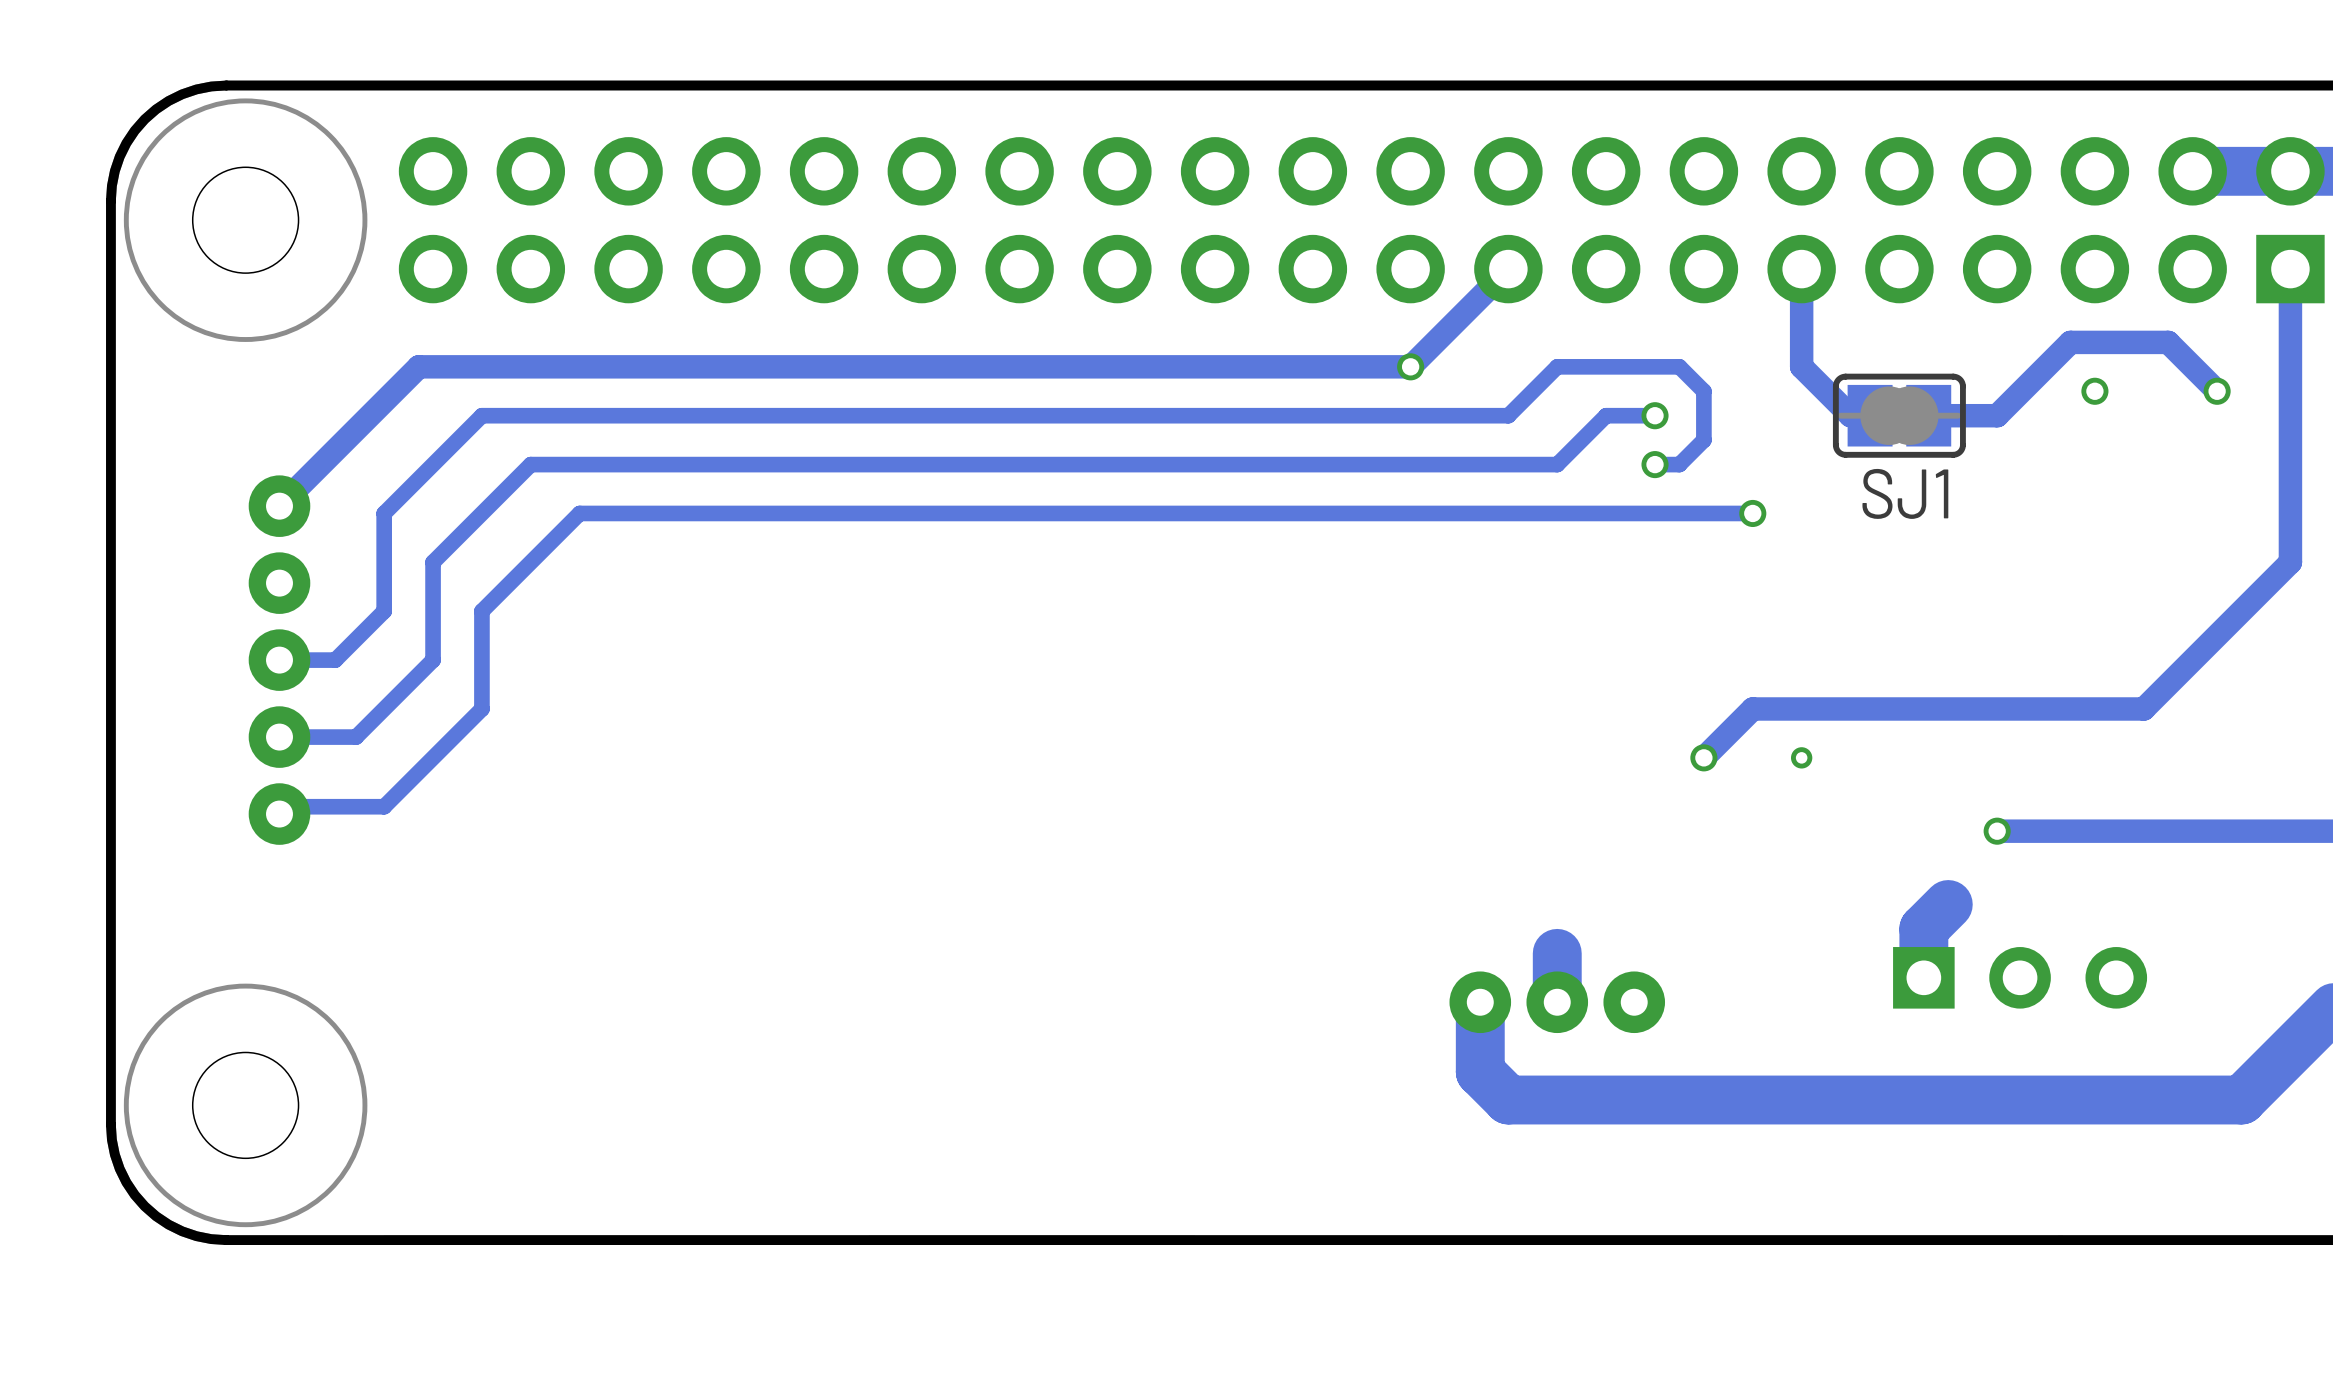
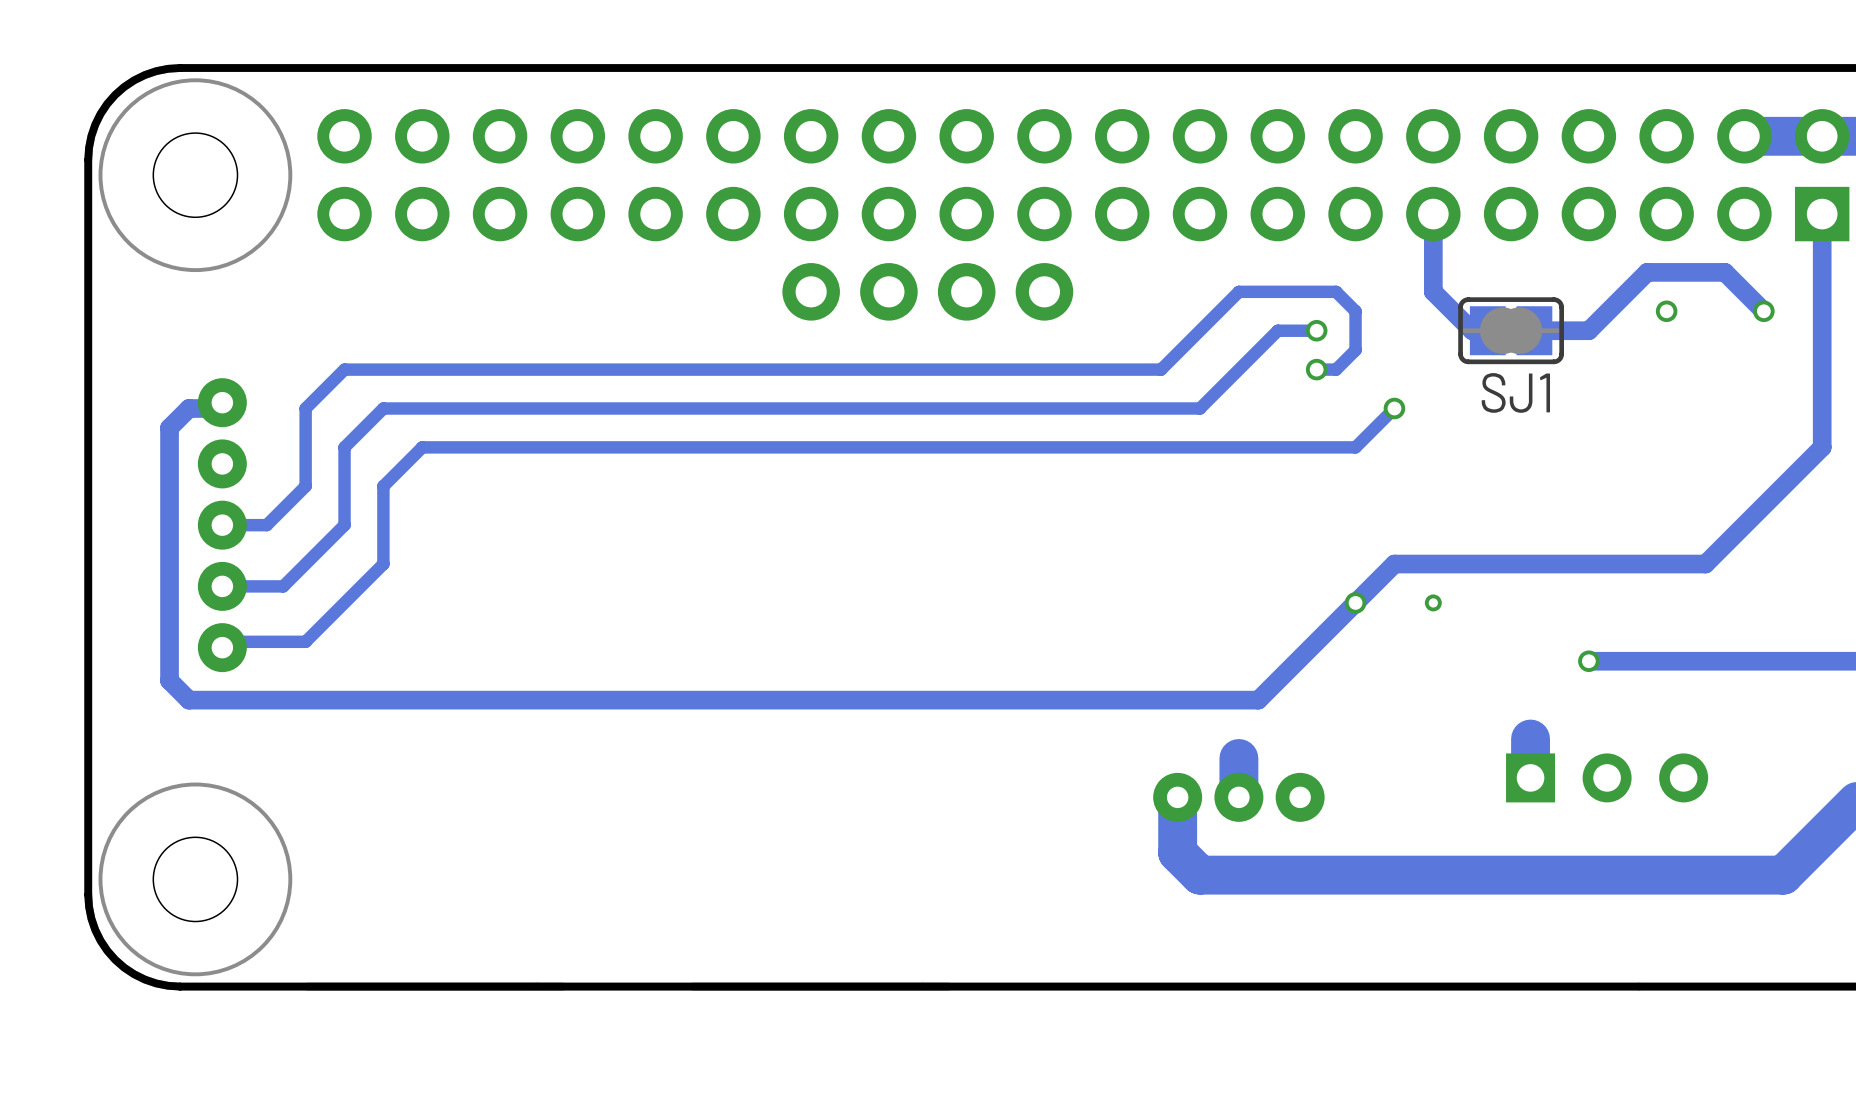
track: (1508, 269) (1410, 366) (418, 366) (279, 506) -> (1355, 602) (1258, 700) (188, 700) (169, 680) (169, 427) (188, 408) (216, 408) (222, 402)
part: none -> (927, 291)
via: (1410, 366) -> none
track: (1508, 415) (481, 415) (433, 464) -> none
track: (530, 464) (481, 513) -> (422, 369) (344, 369)
track: (1557, 464) (1459, 464) -> (1200, 330) (1161, 369)
track: (579, 513) (530, 562) -> (461, 408) (383, 408)
track: (1752, 513) (1508, 513) -> (1238, 369) (1200, 408)
track: none -> (1394, 408) (1355, 447) (422, 447)
track: (1948, 904) (1923, 928) -> none

